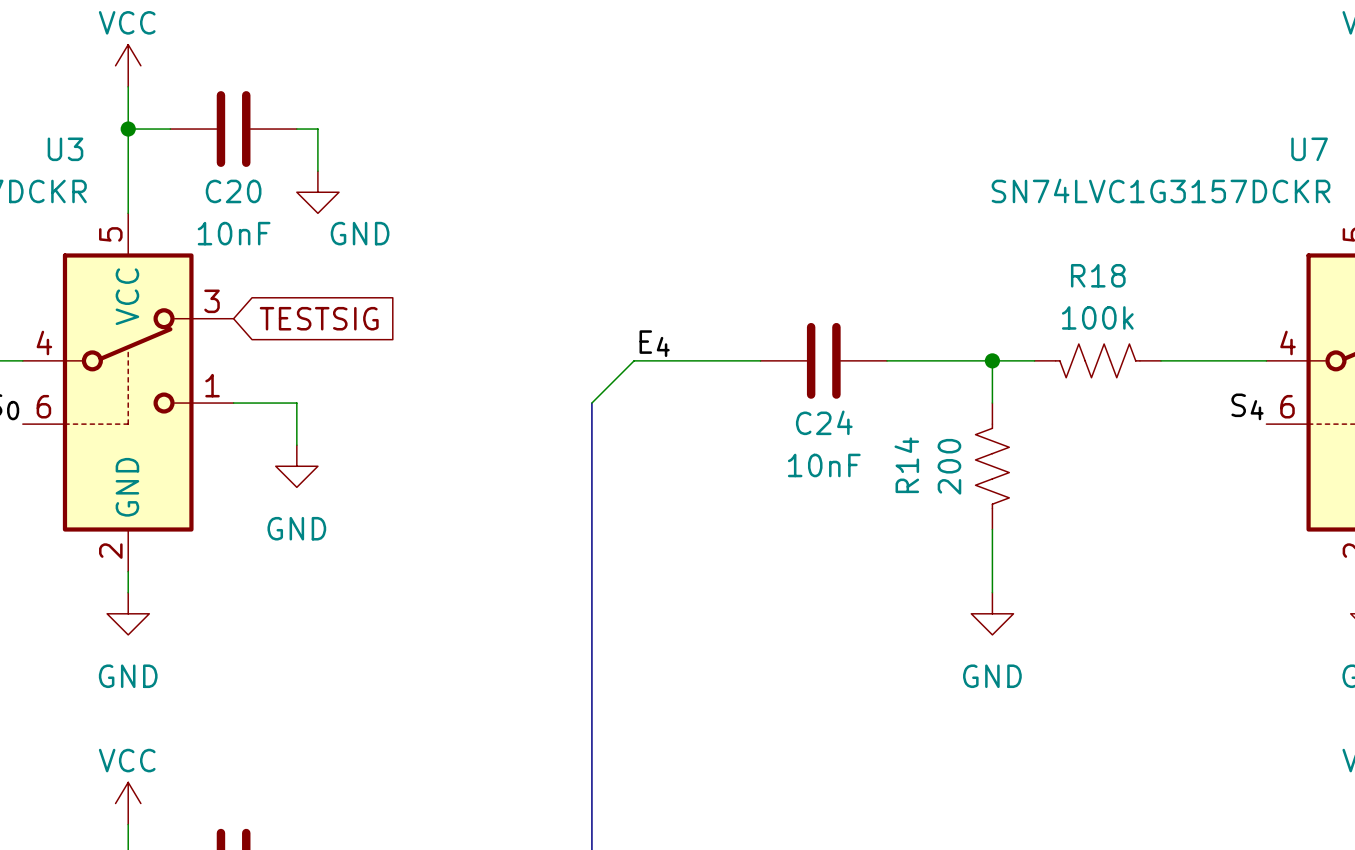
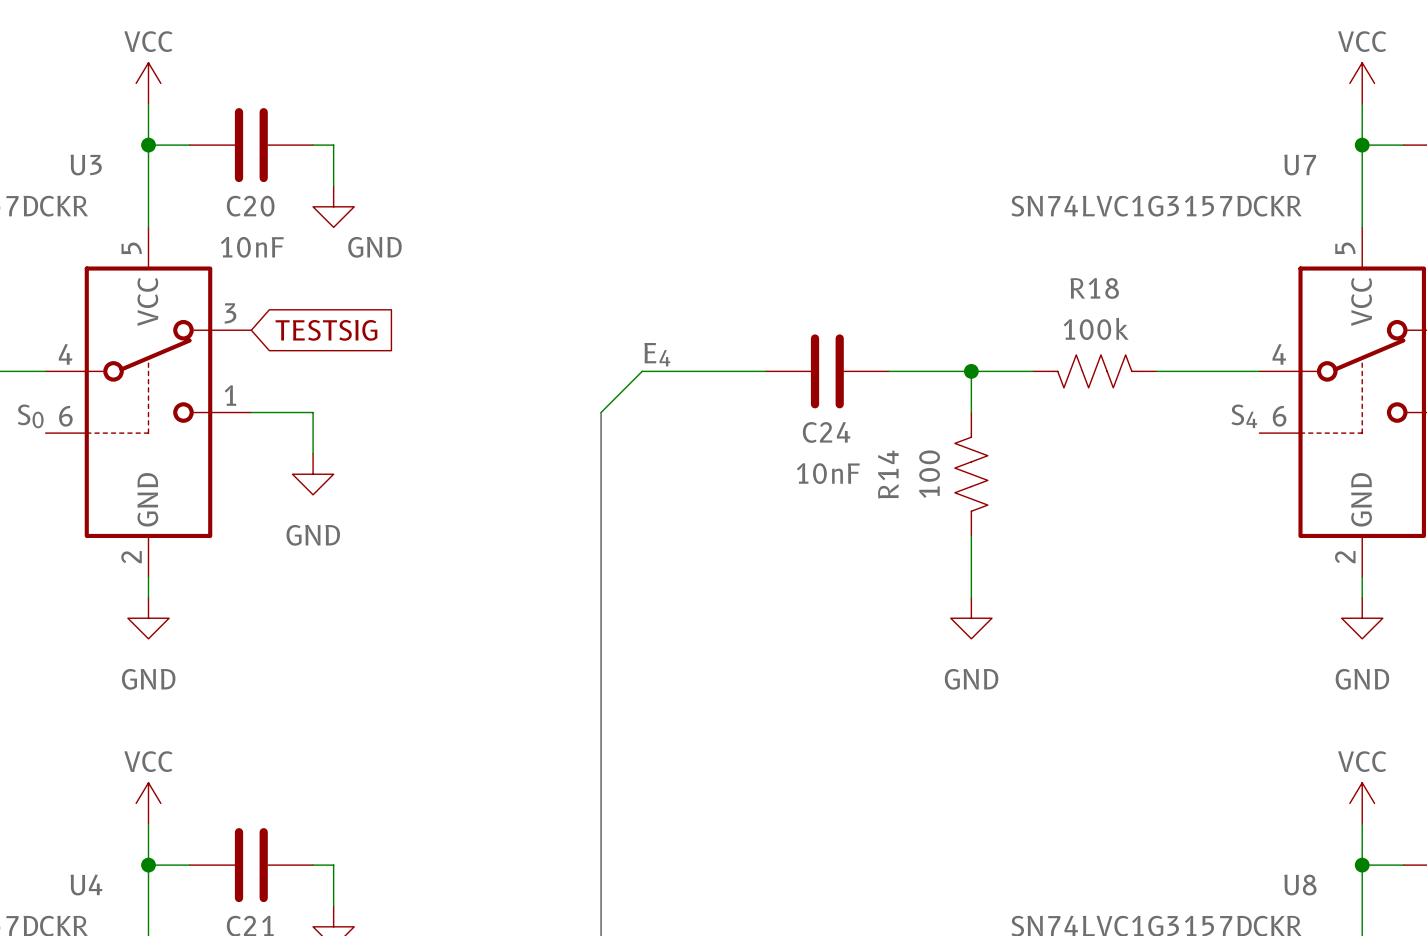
wire: (992, 360) (992, 403) -> (971, 371) (971, 412)
junction position: (992, 360) -> (971, 371)
R14 value: 200 (949, 466) -> 100 (929, 474)
R14 position: (992, 466) -> (971, 474)
wire: (992, 529) (992, 592) -> (971, 535) (971, 597)
power symbol position: GND (992, 613) -> GND (971, 618)

